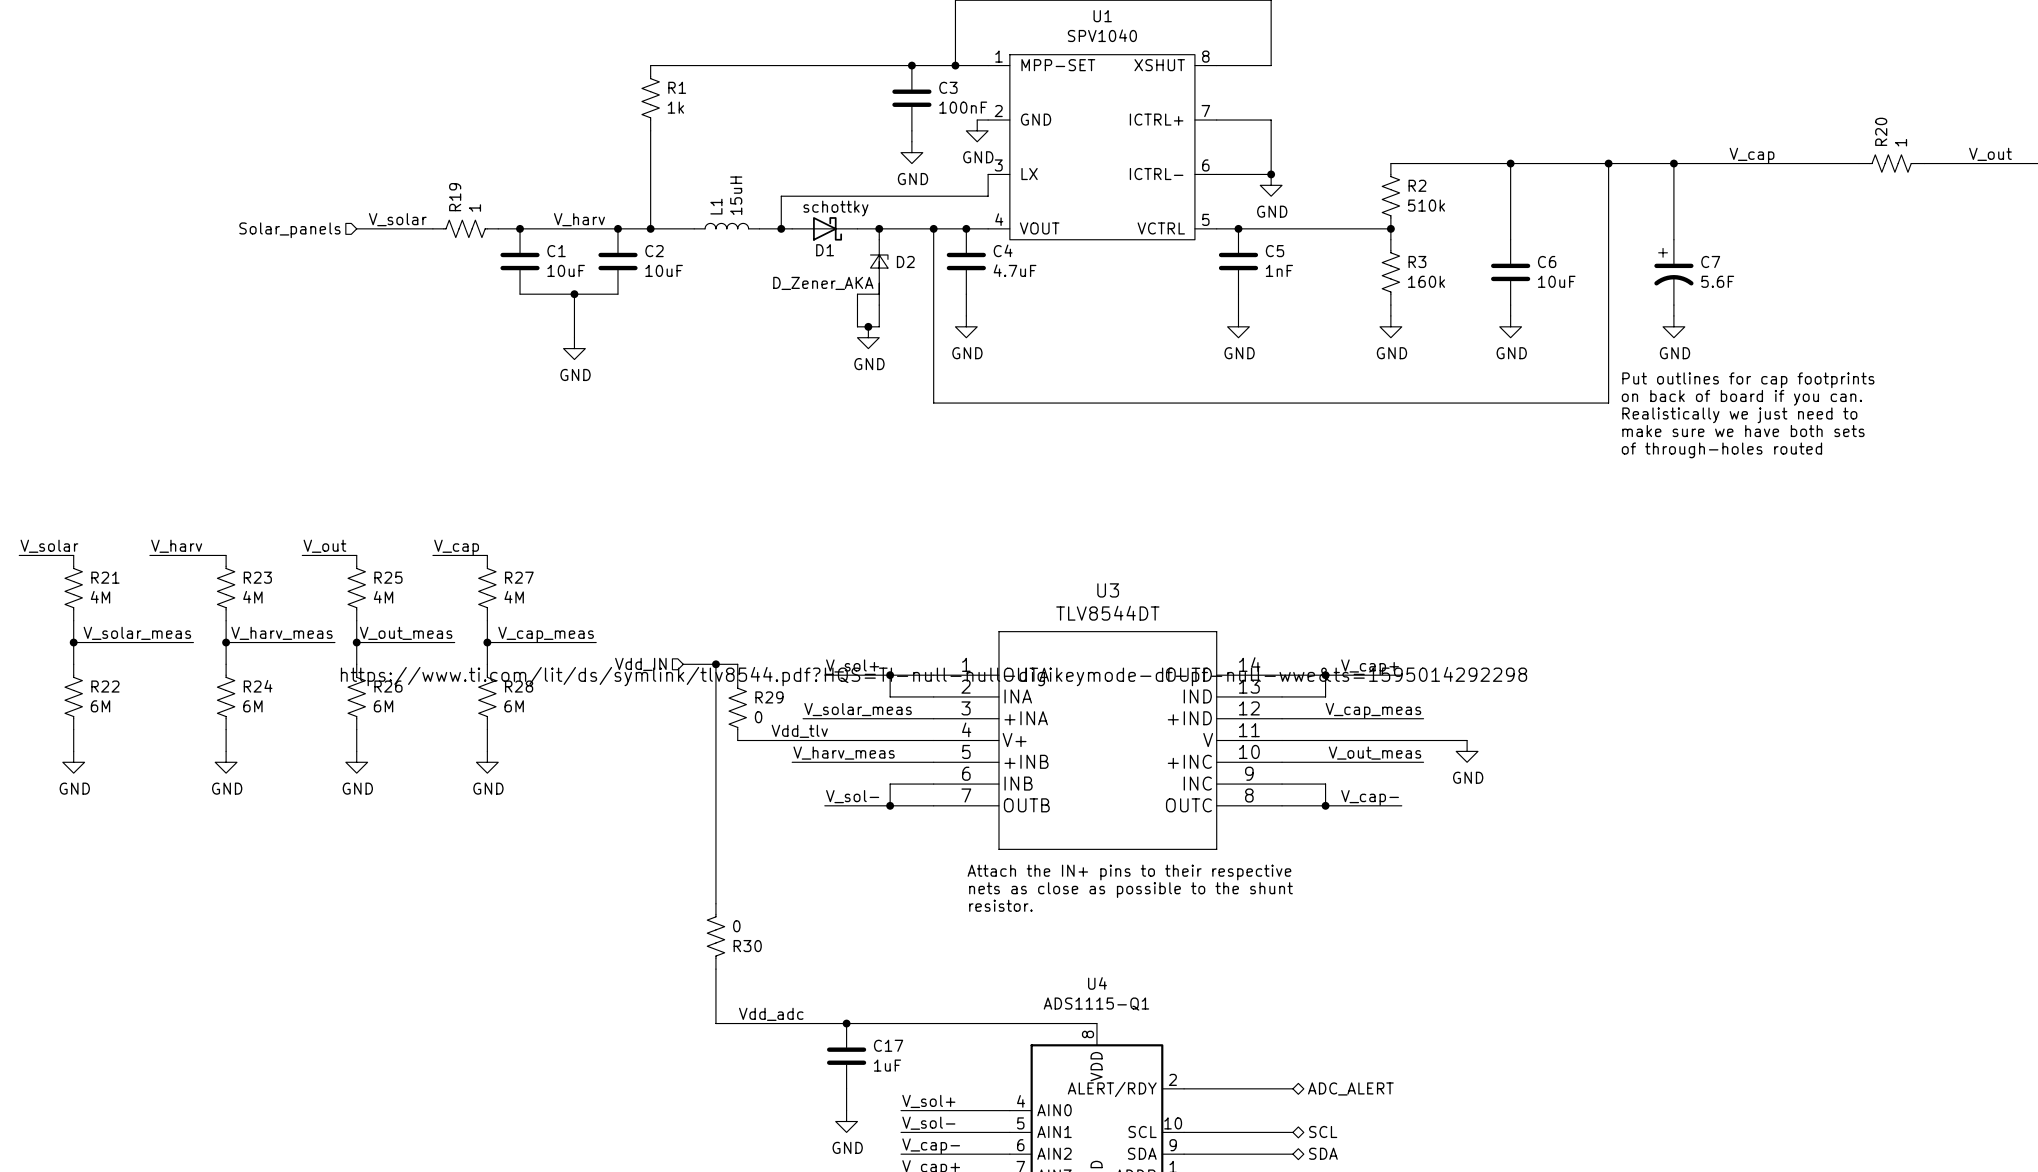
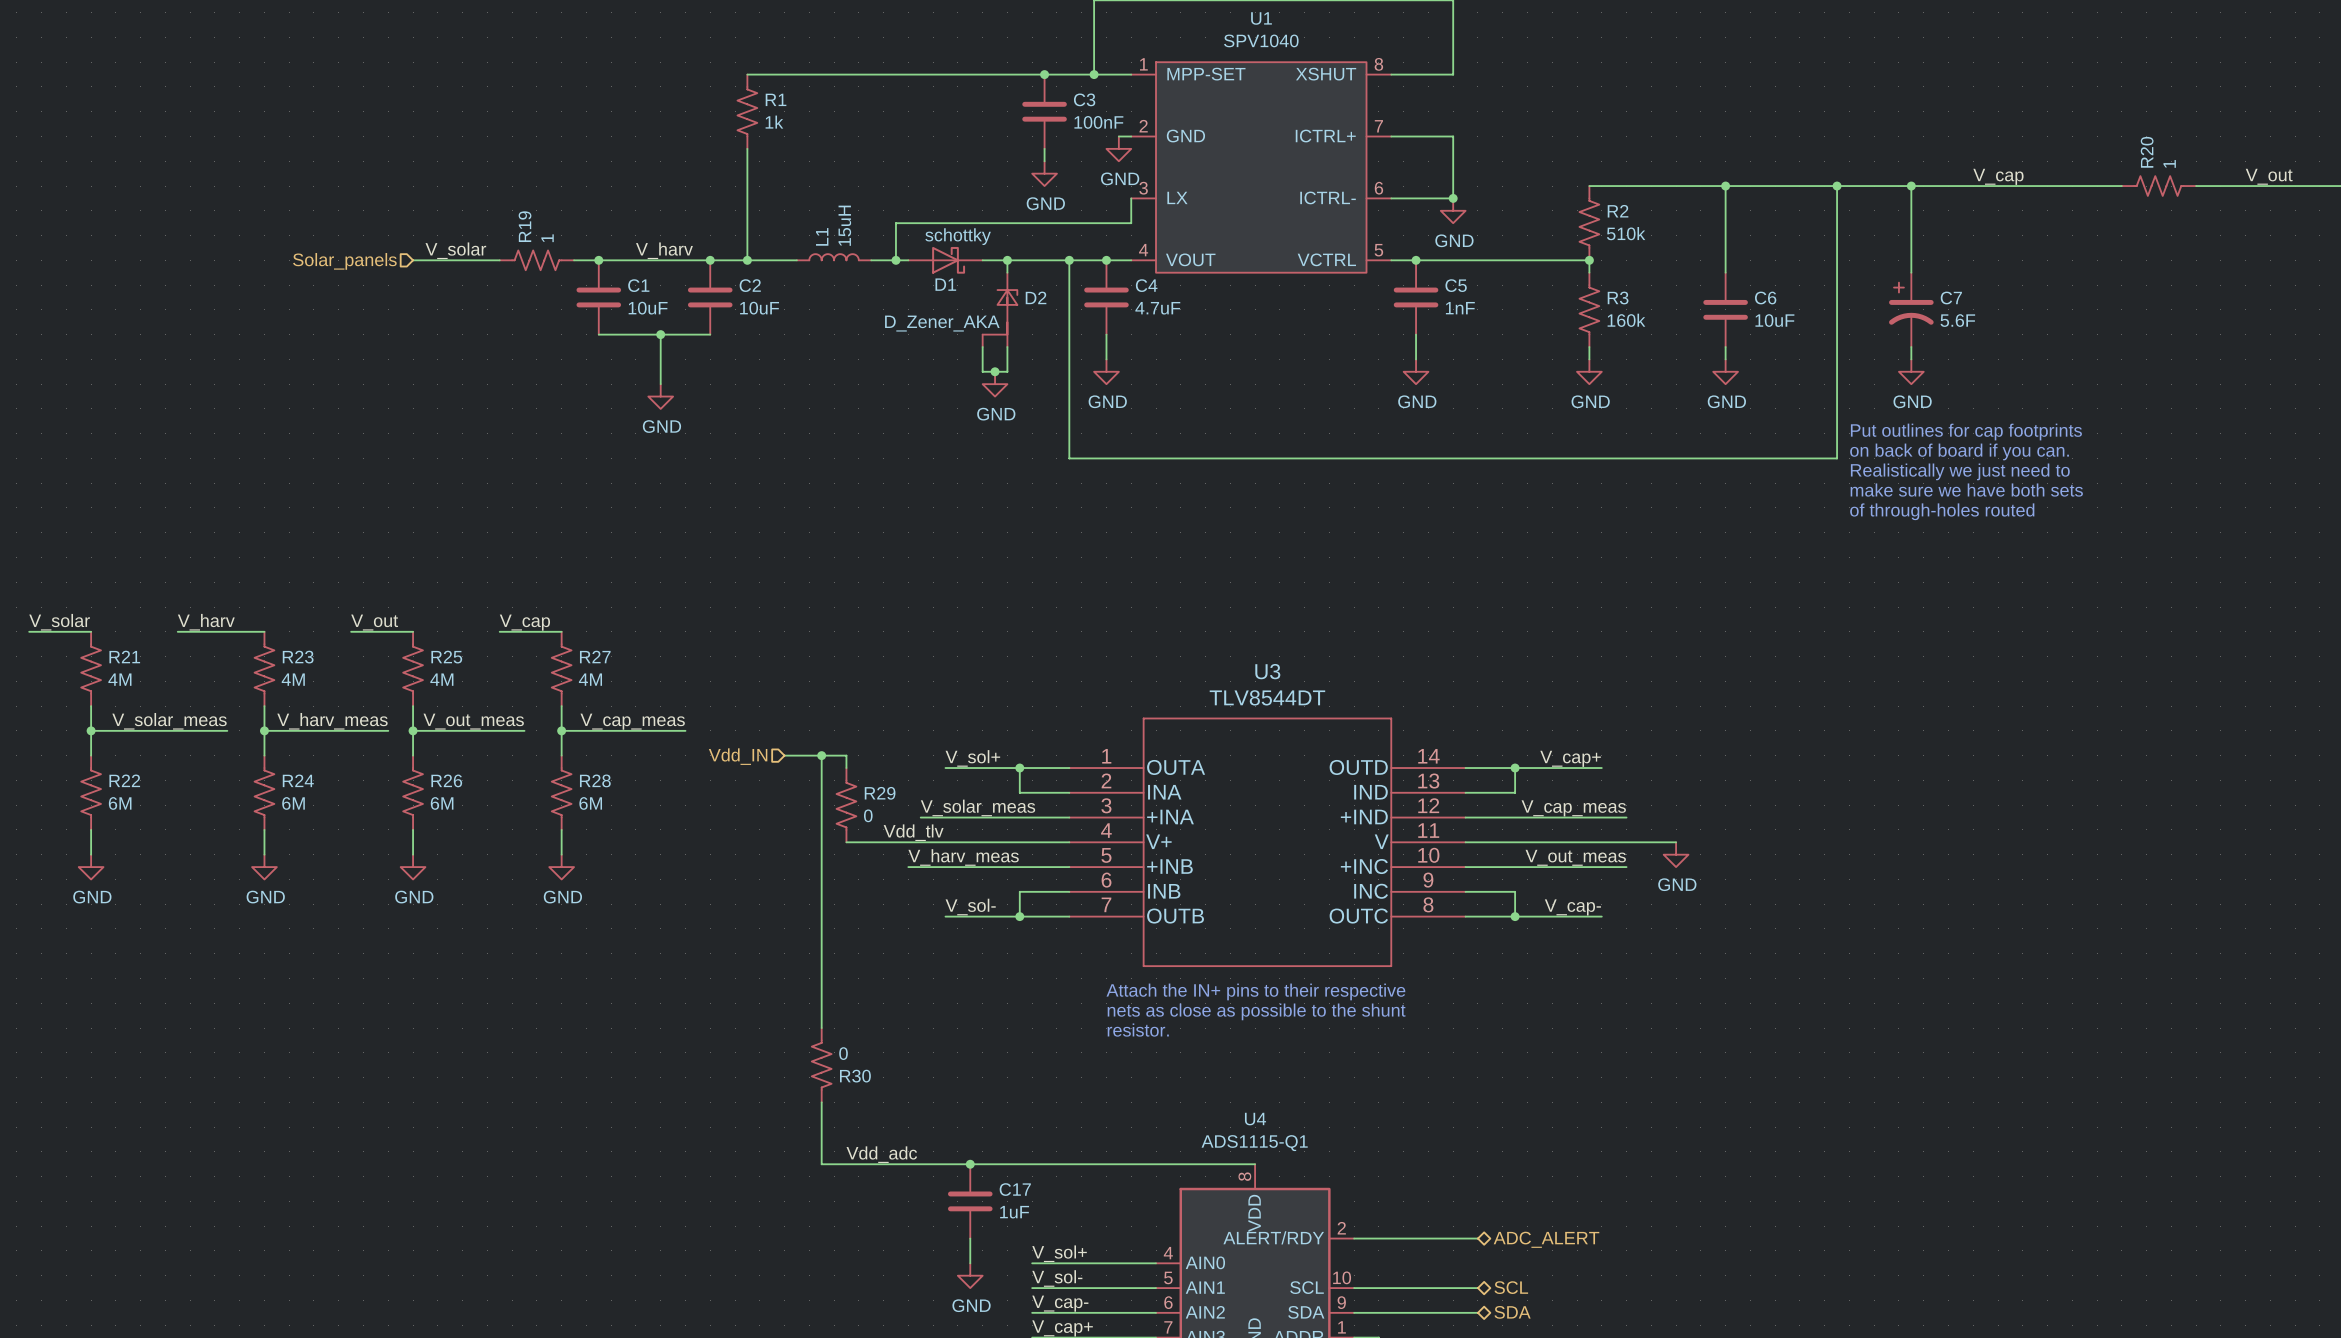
U3 text: https://www.ti.com/lit/ds/symlink/tlv8544.pdf?HQS=TI-null-null-digikeymode-df-pf-null-wwe&ts=1595014292298 (933, 676) -> none

